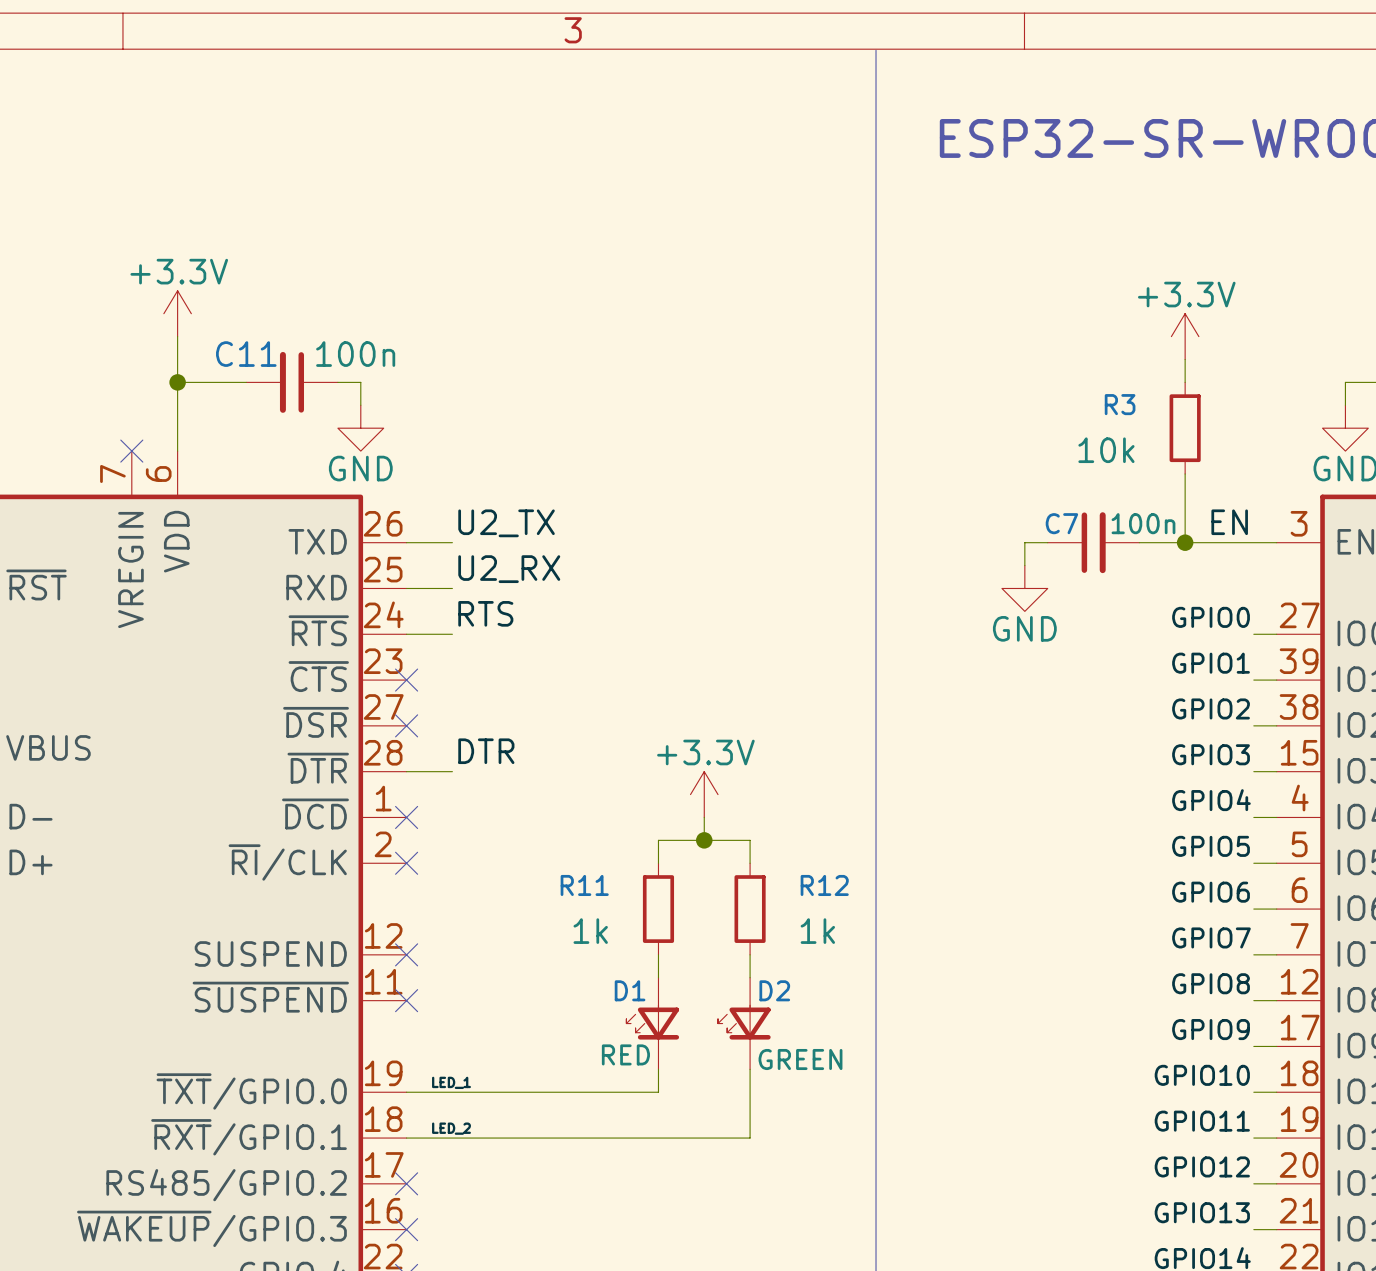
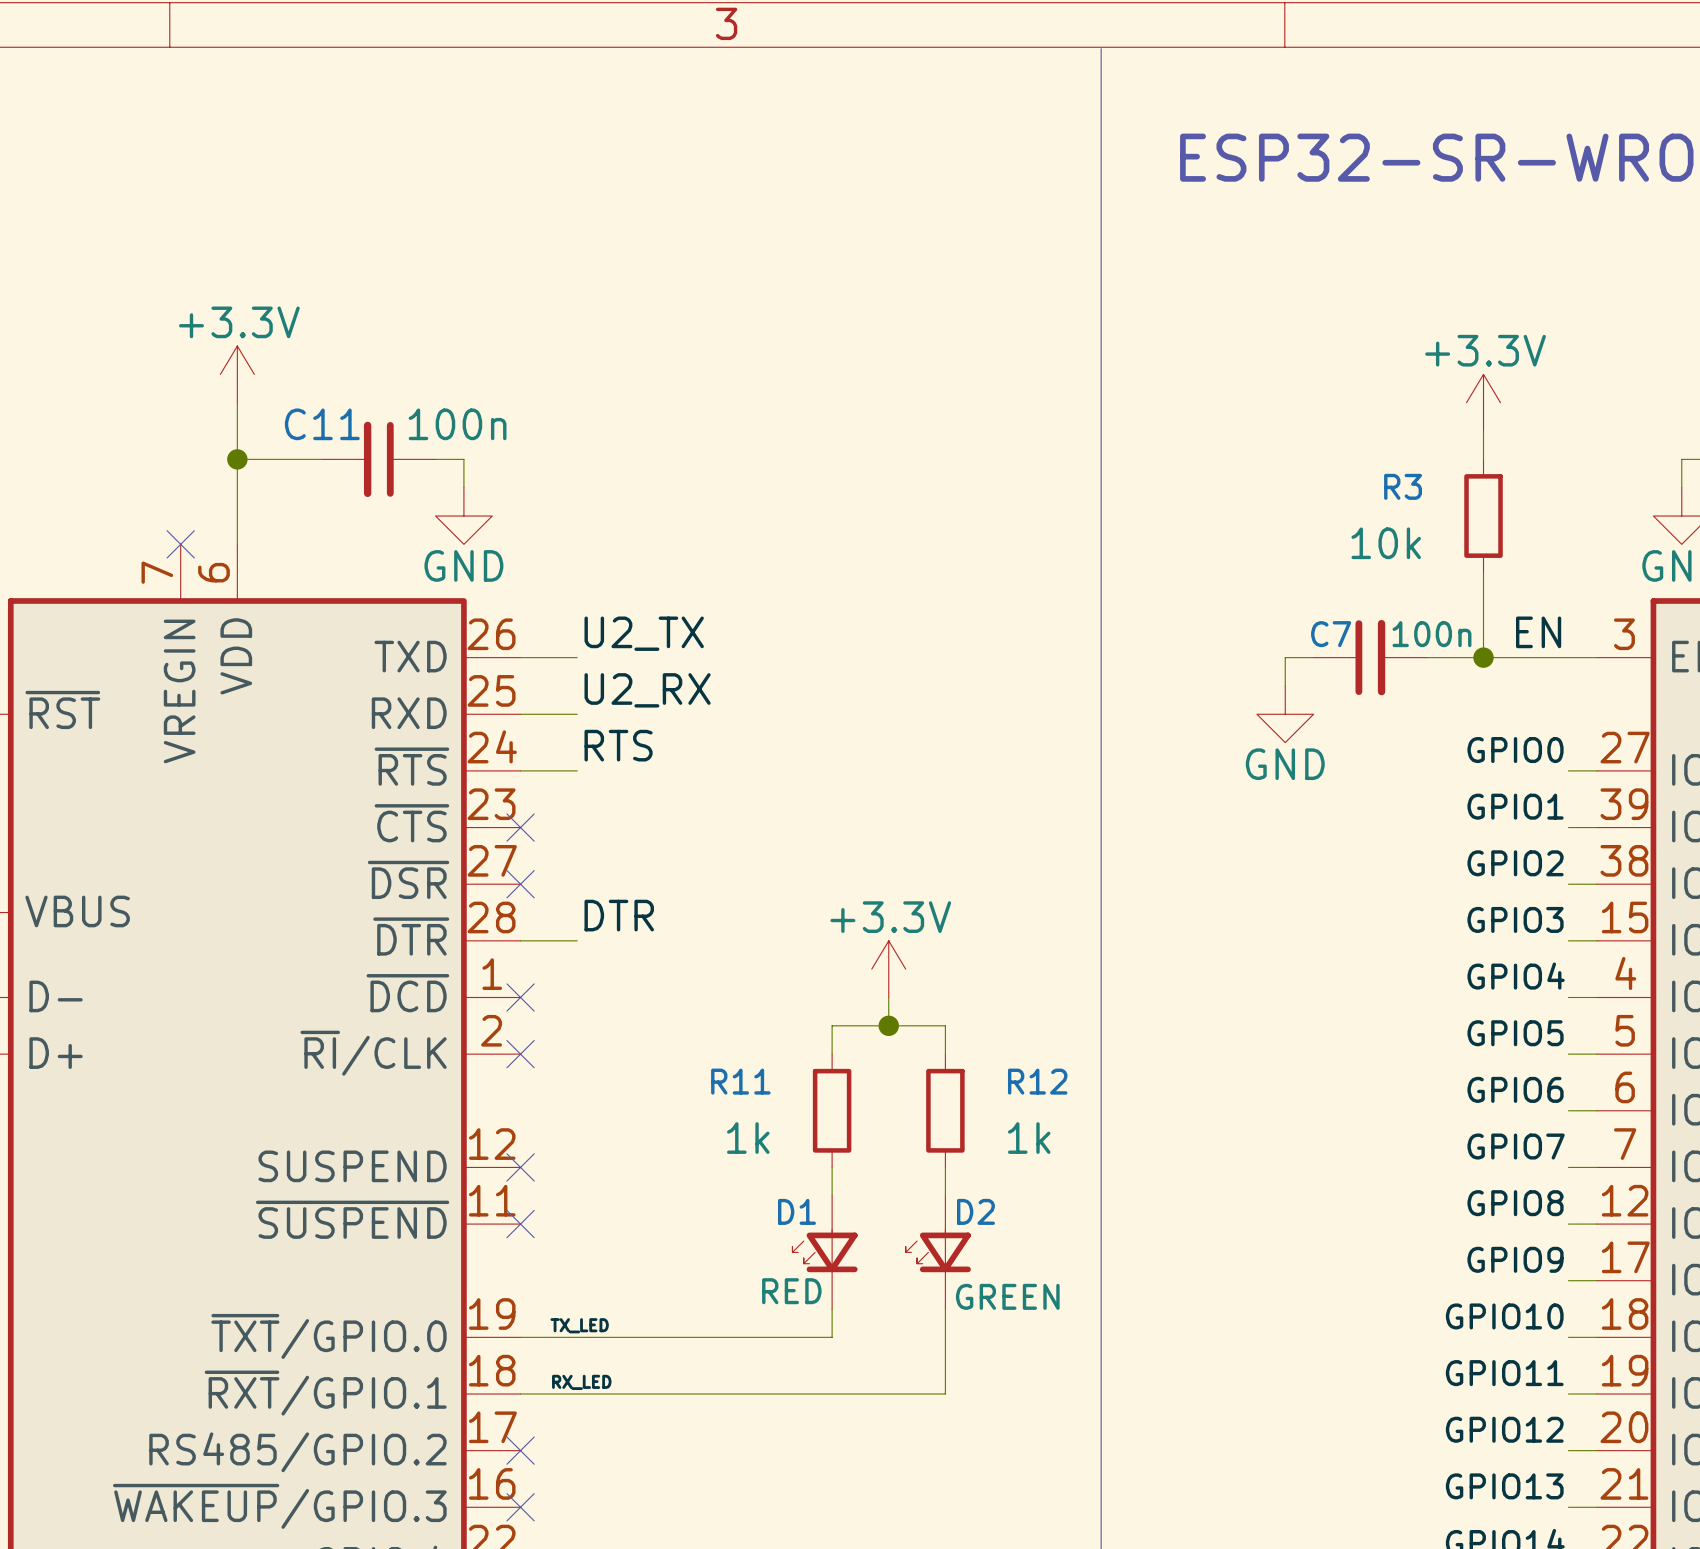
label: LED_1 (451, 1082) -> TX_LED (579, 1325)
label: LED_2 (451, 1128) -> RX_LED (581, 1382)

